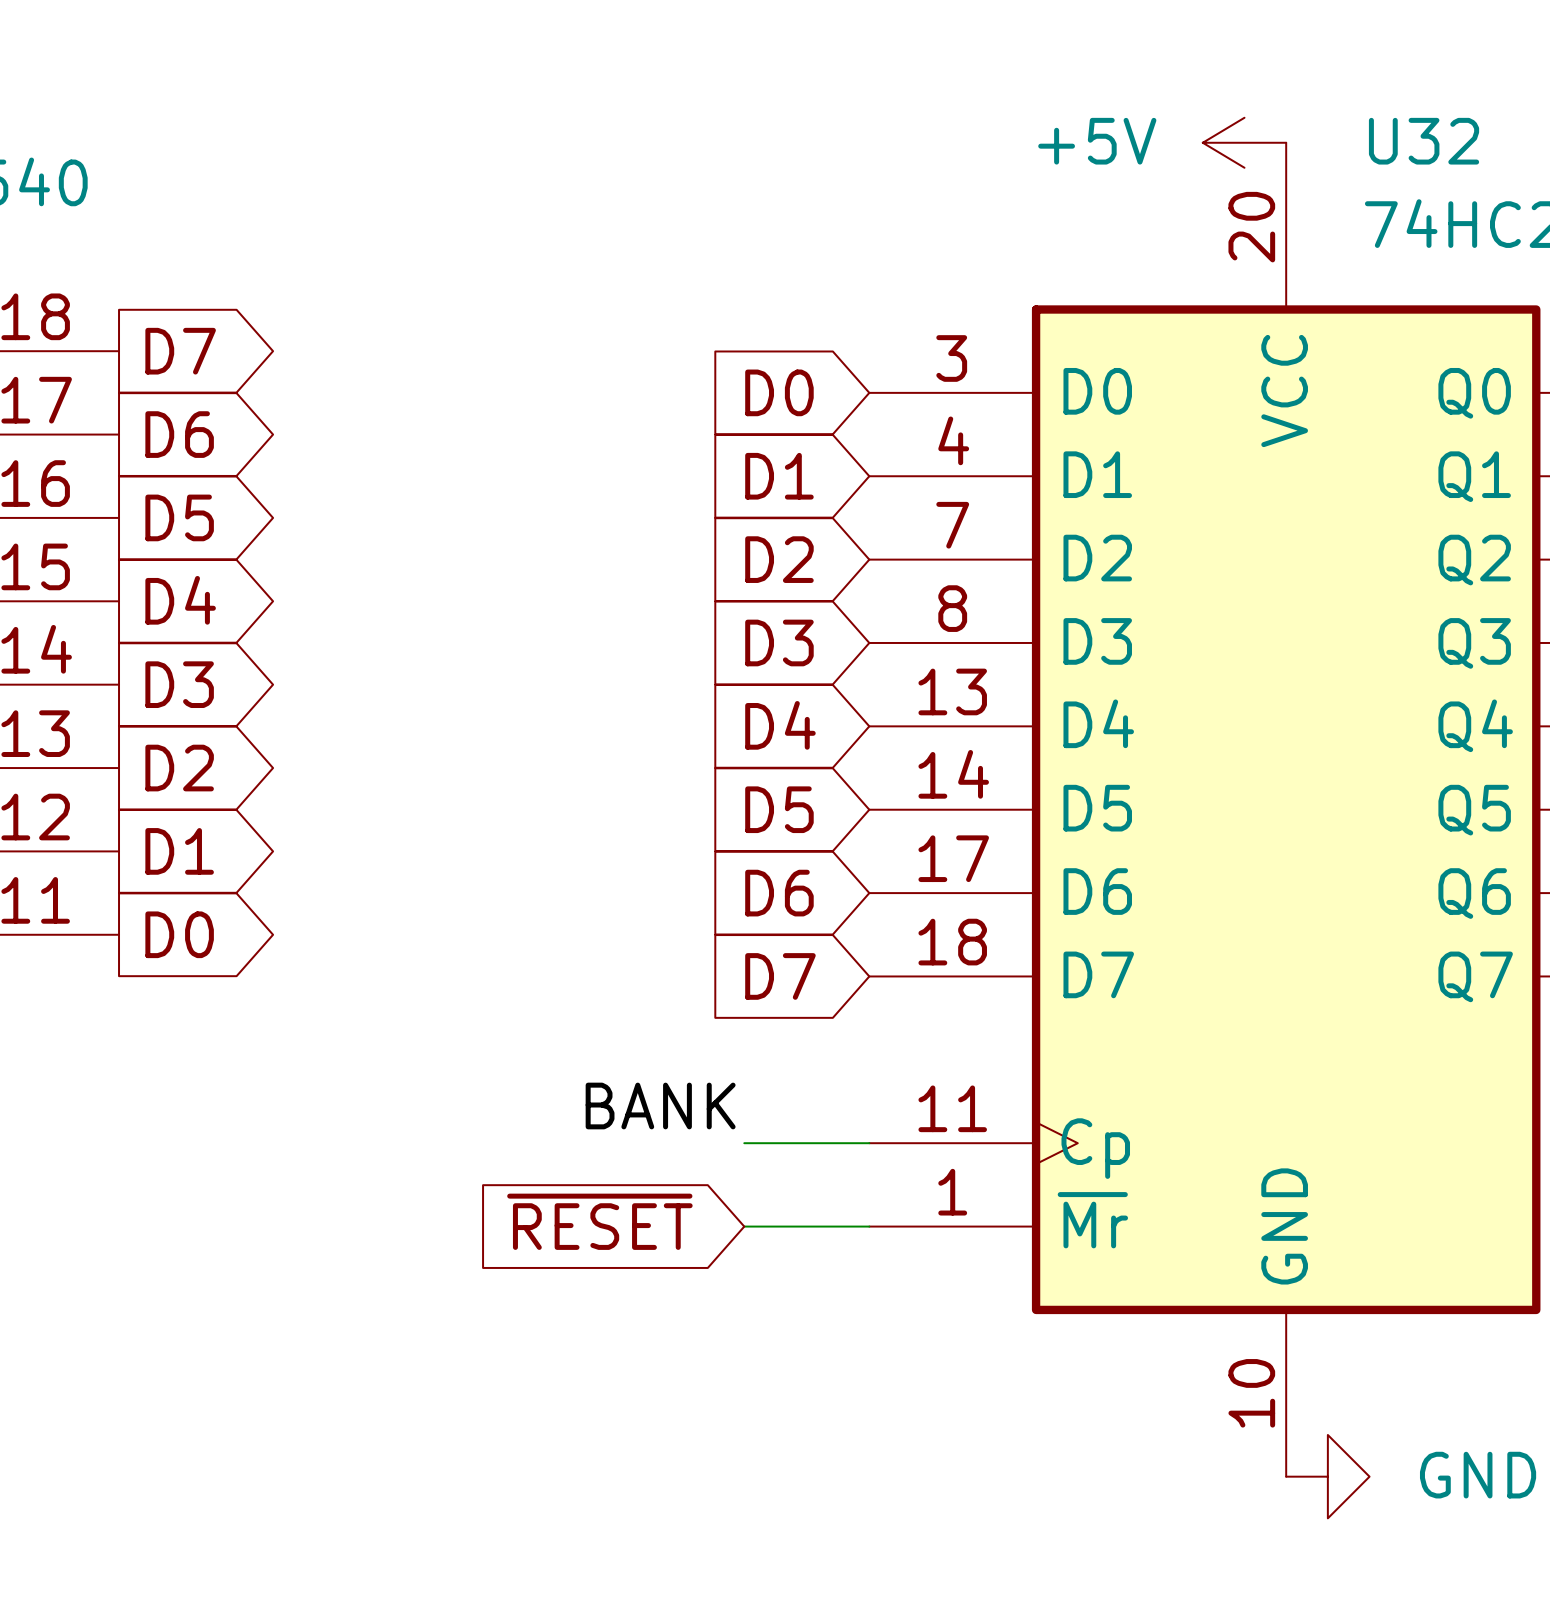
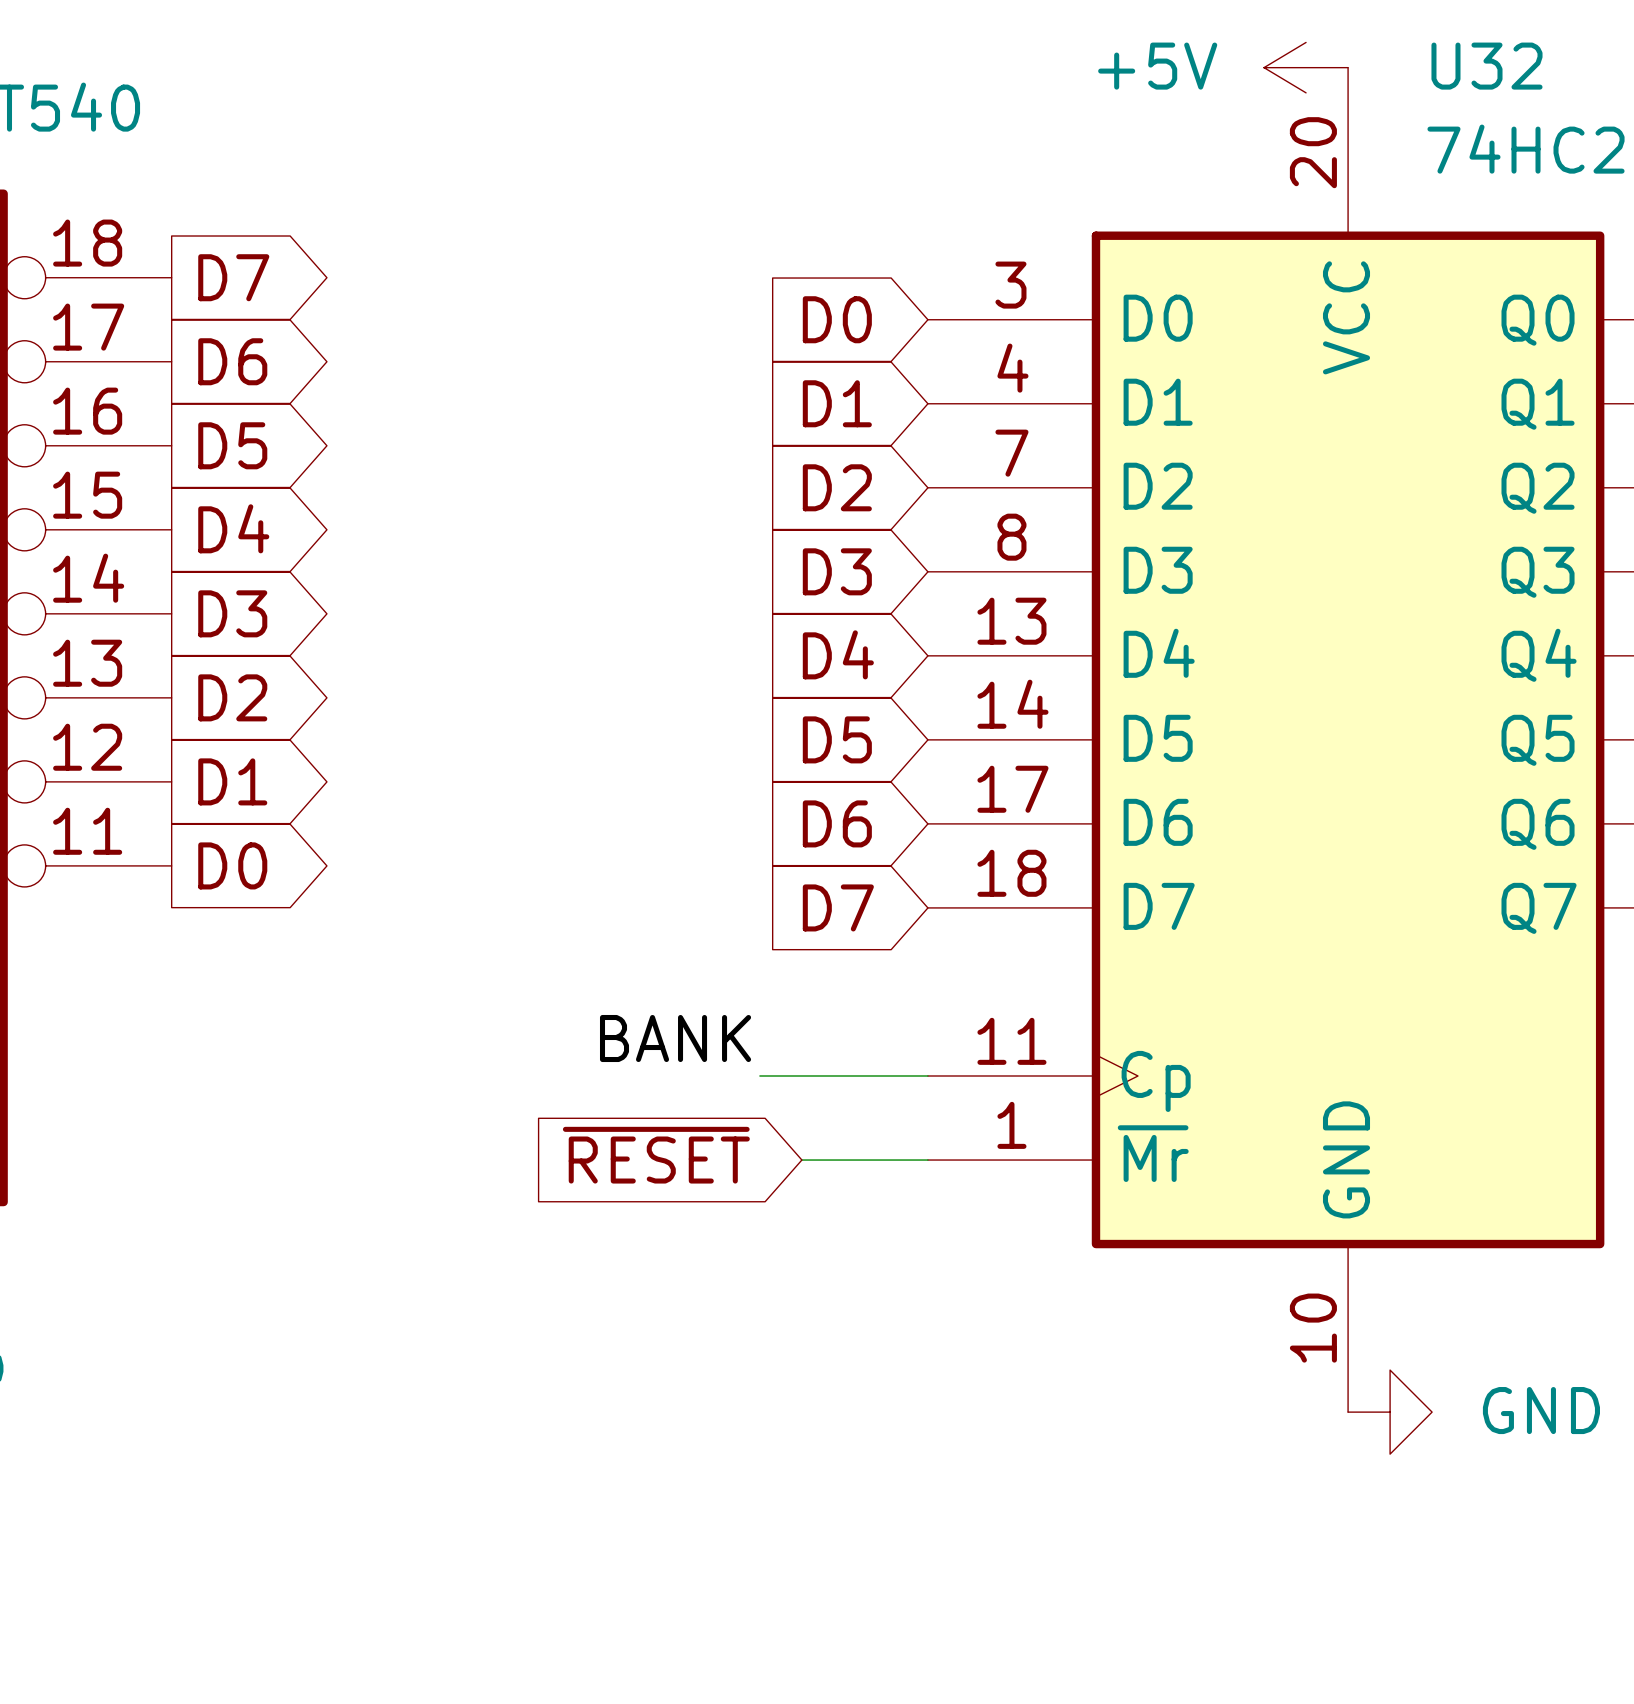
label position: BANK (660, 1106) -> BANK (675, 1038)
wire: none -> (759, 1075) (801, 1075)

